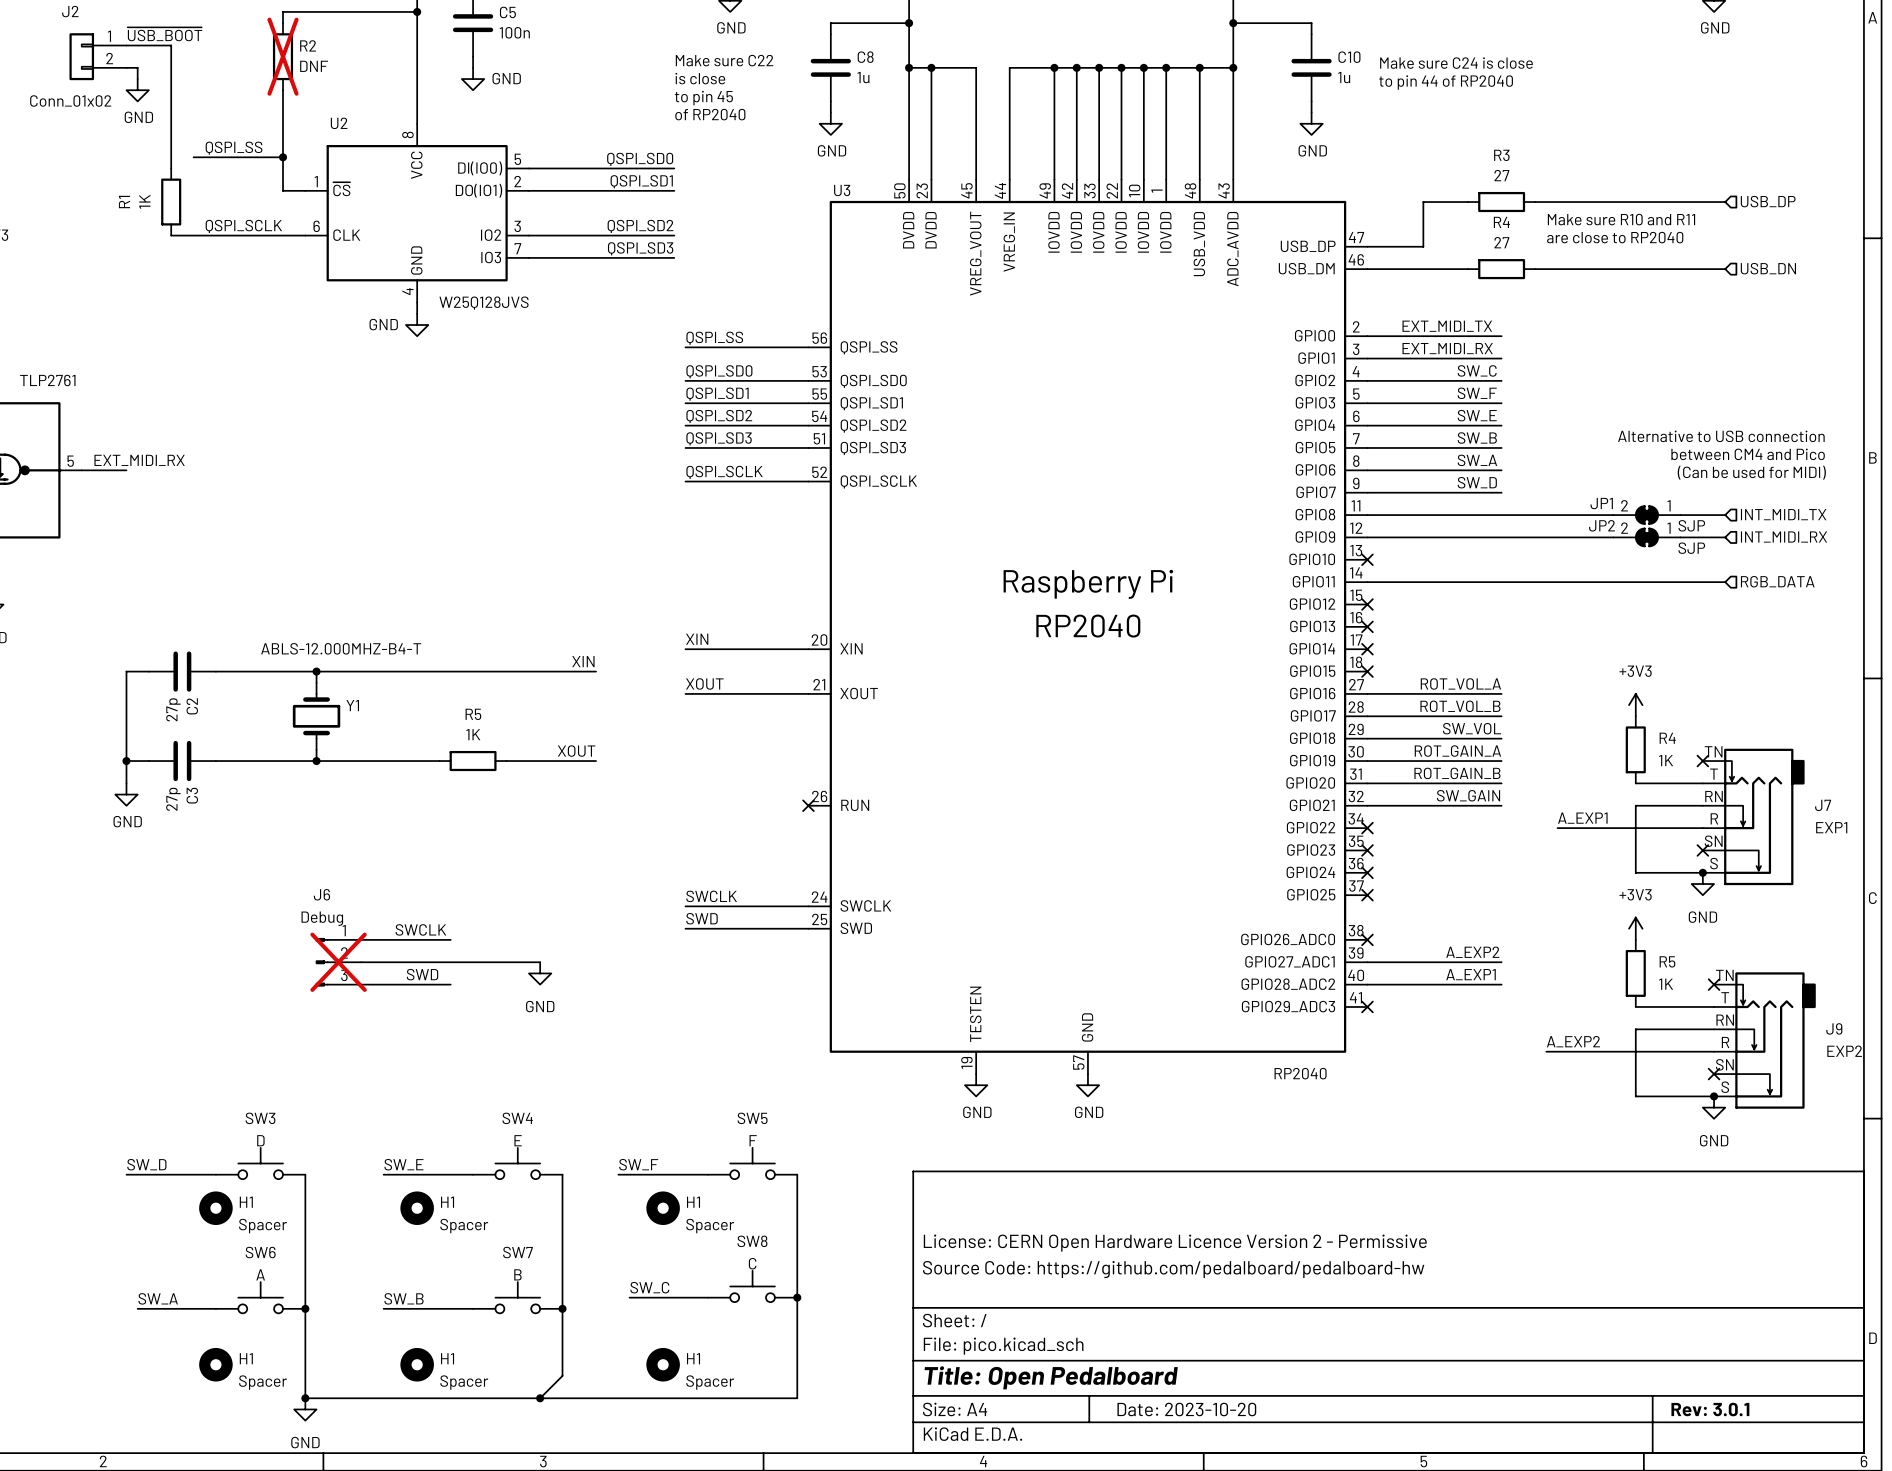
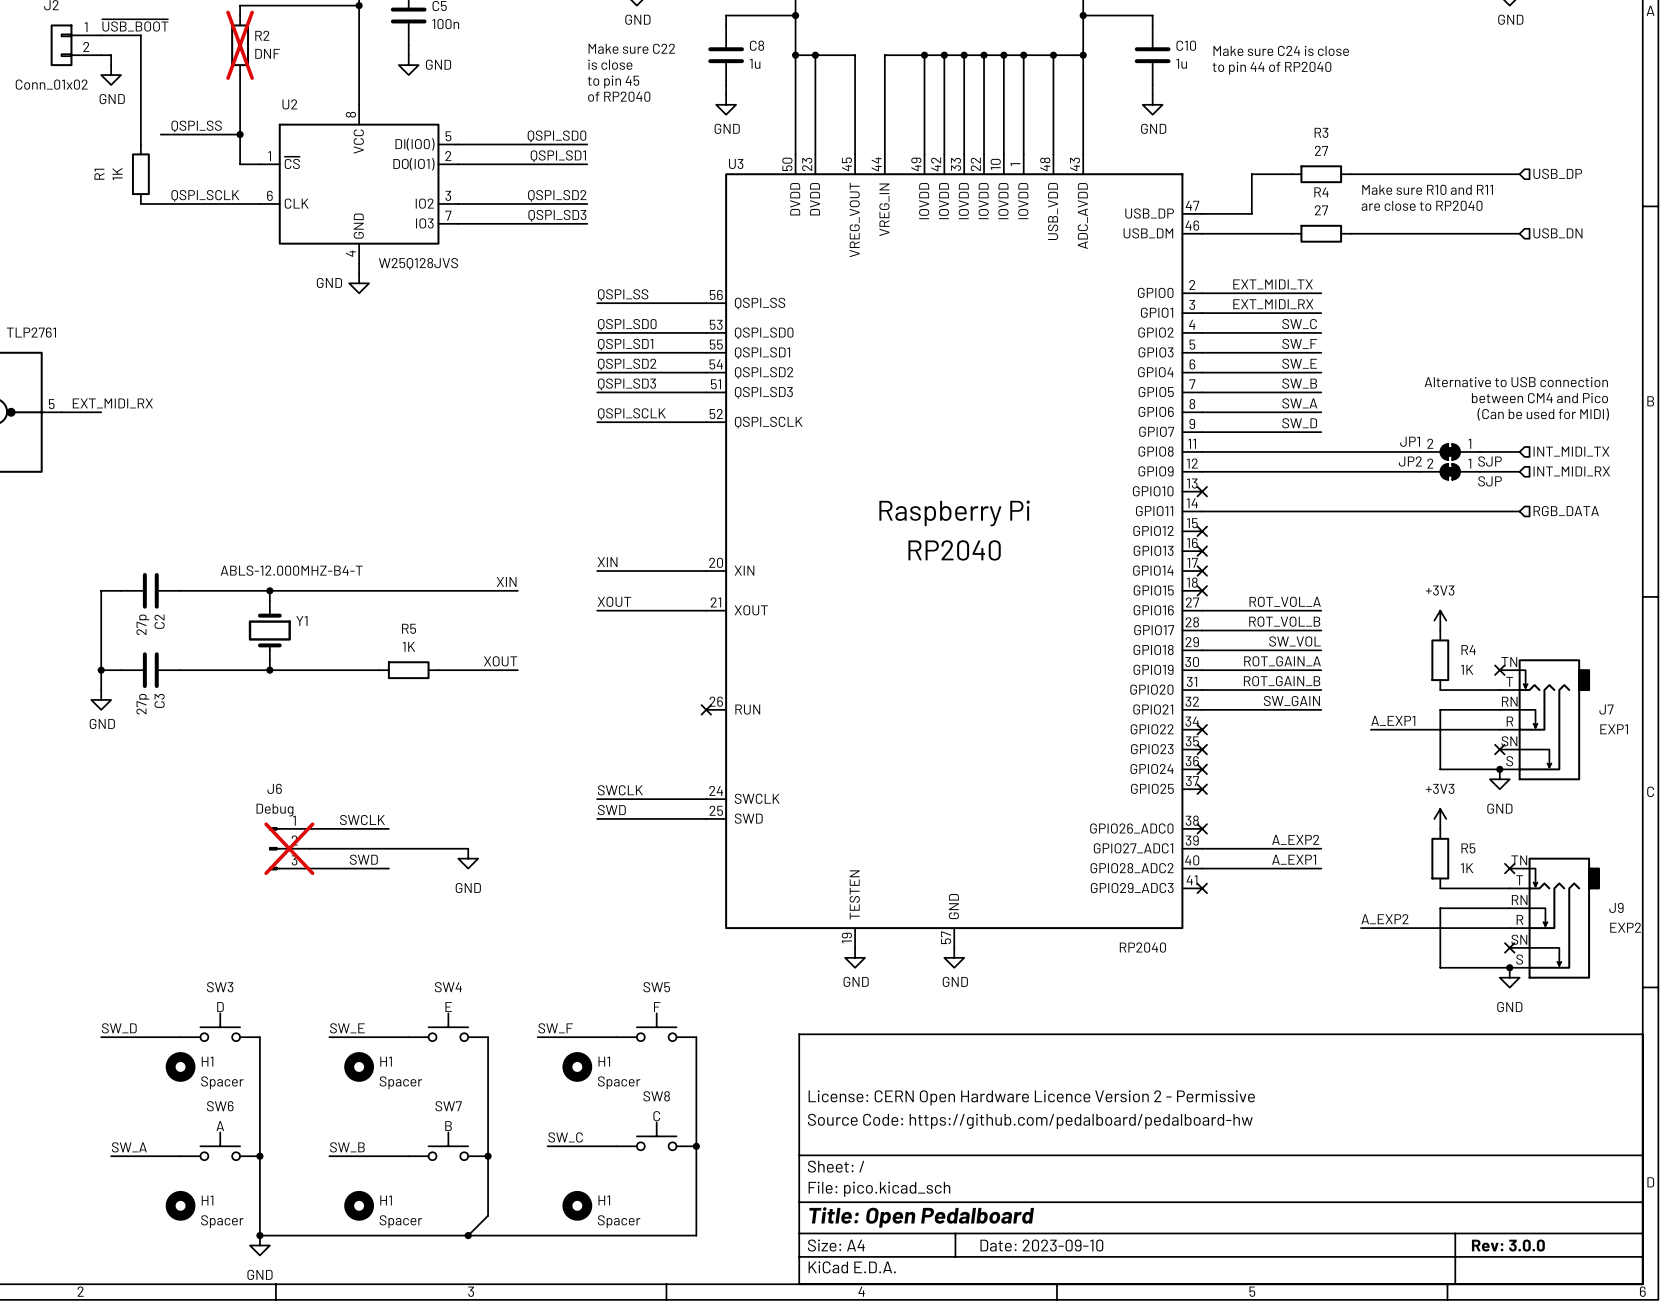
title block: Date: 2023-10-20 (1186, 1409) -> Date: 2023-09-10 (1041, 1245)
title block: Rev: 3.0.1 (1710, 1409) -> Rev: 3.0.0 (1508, 1245)

